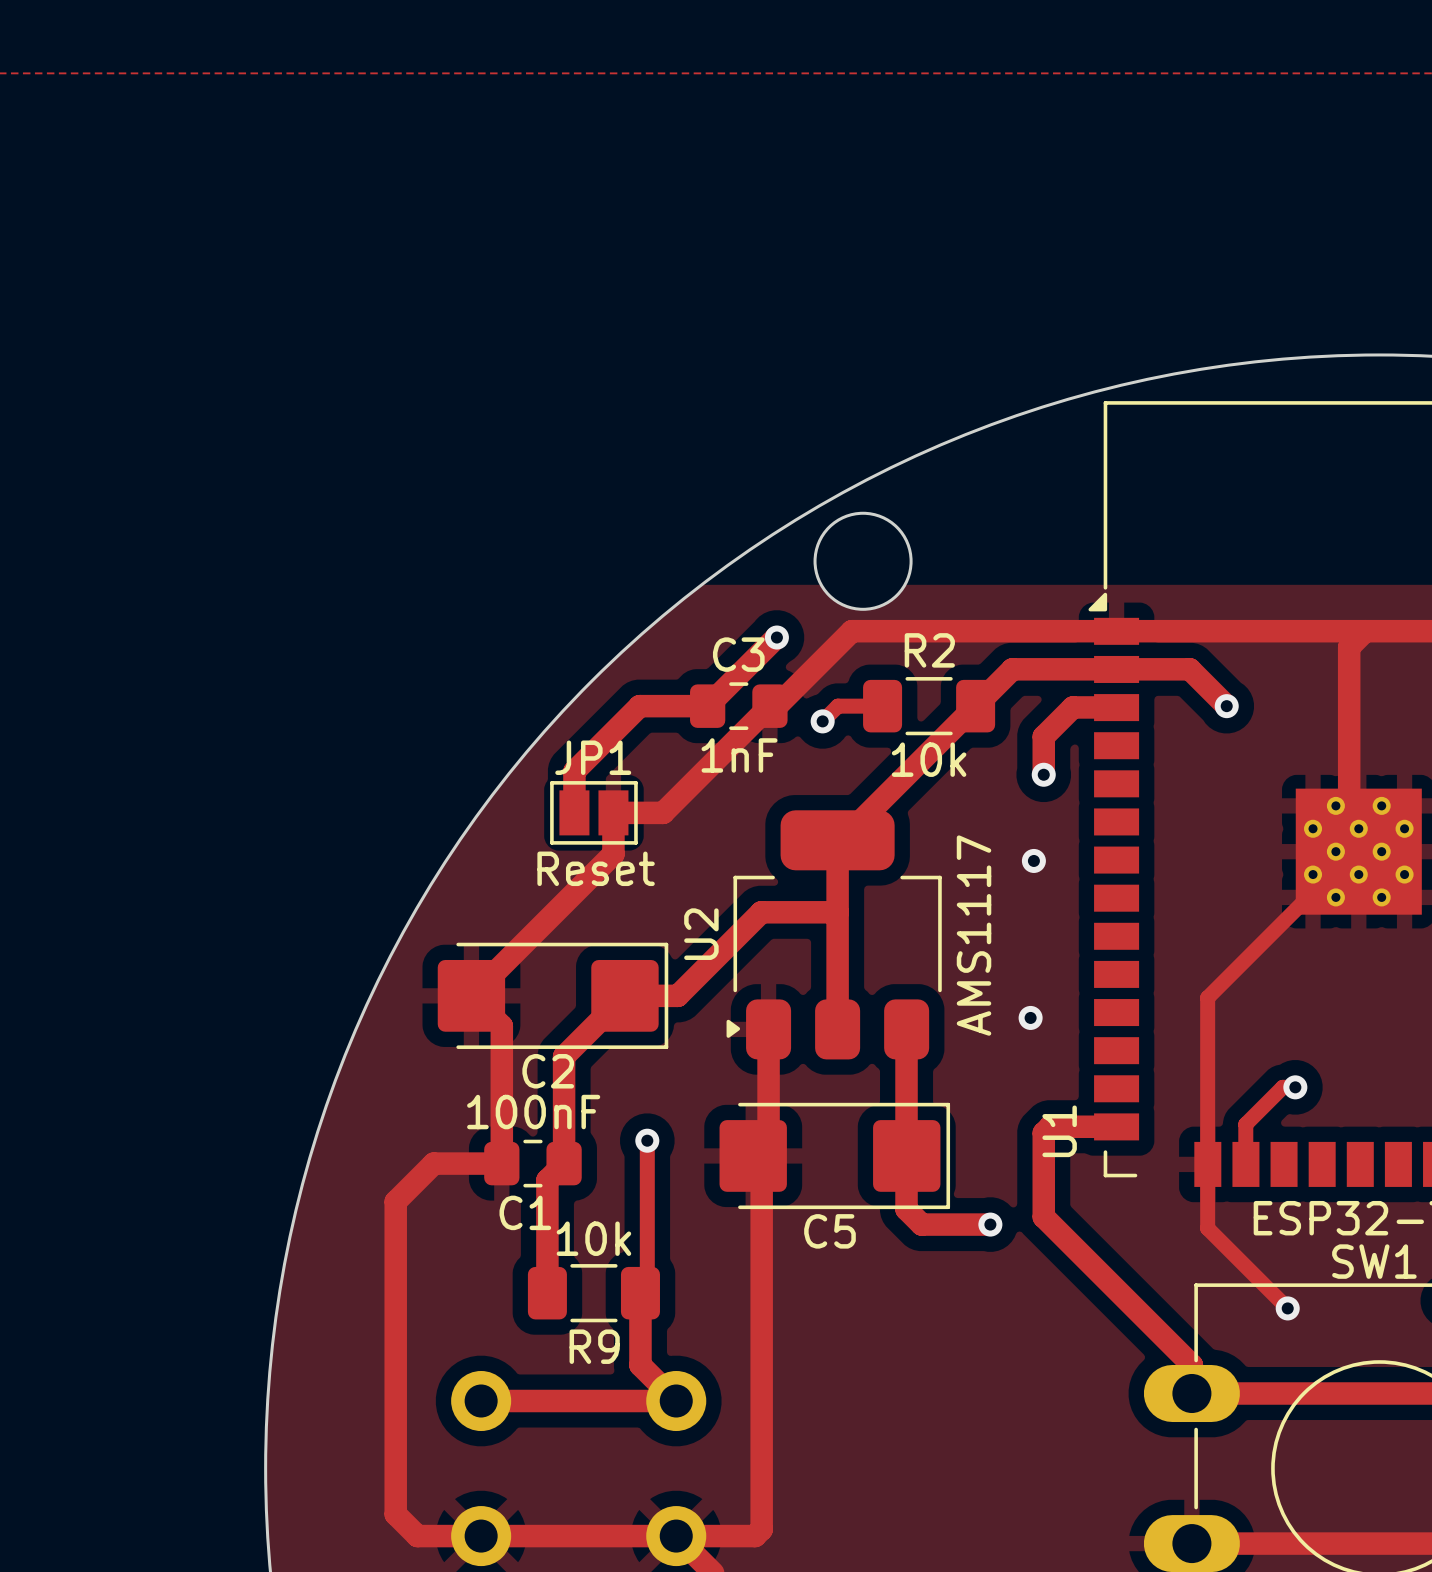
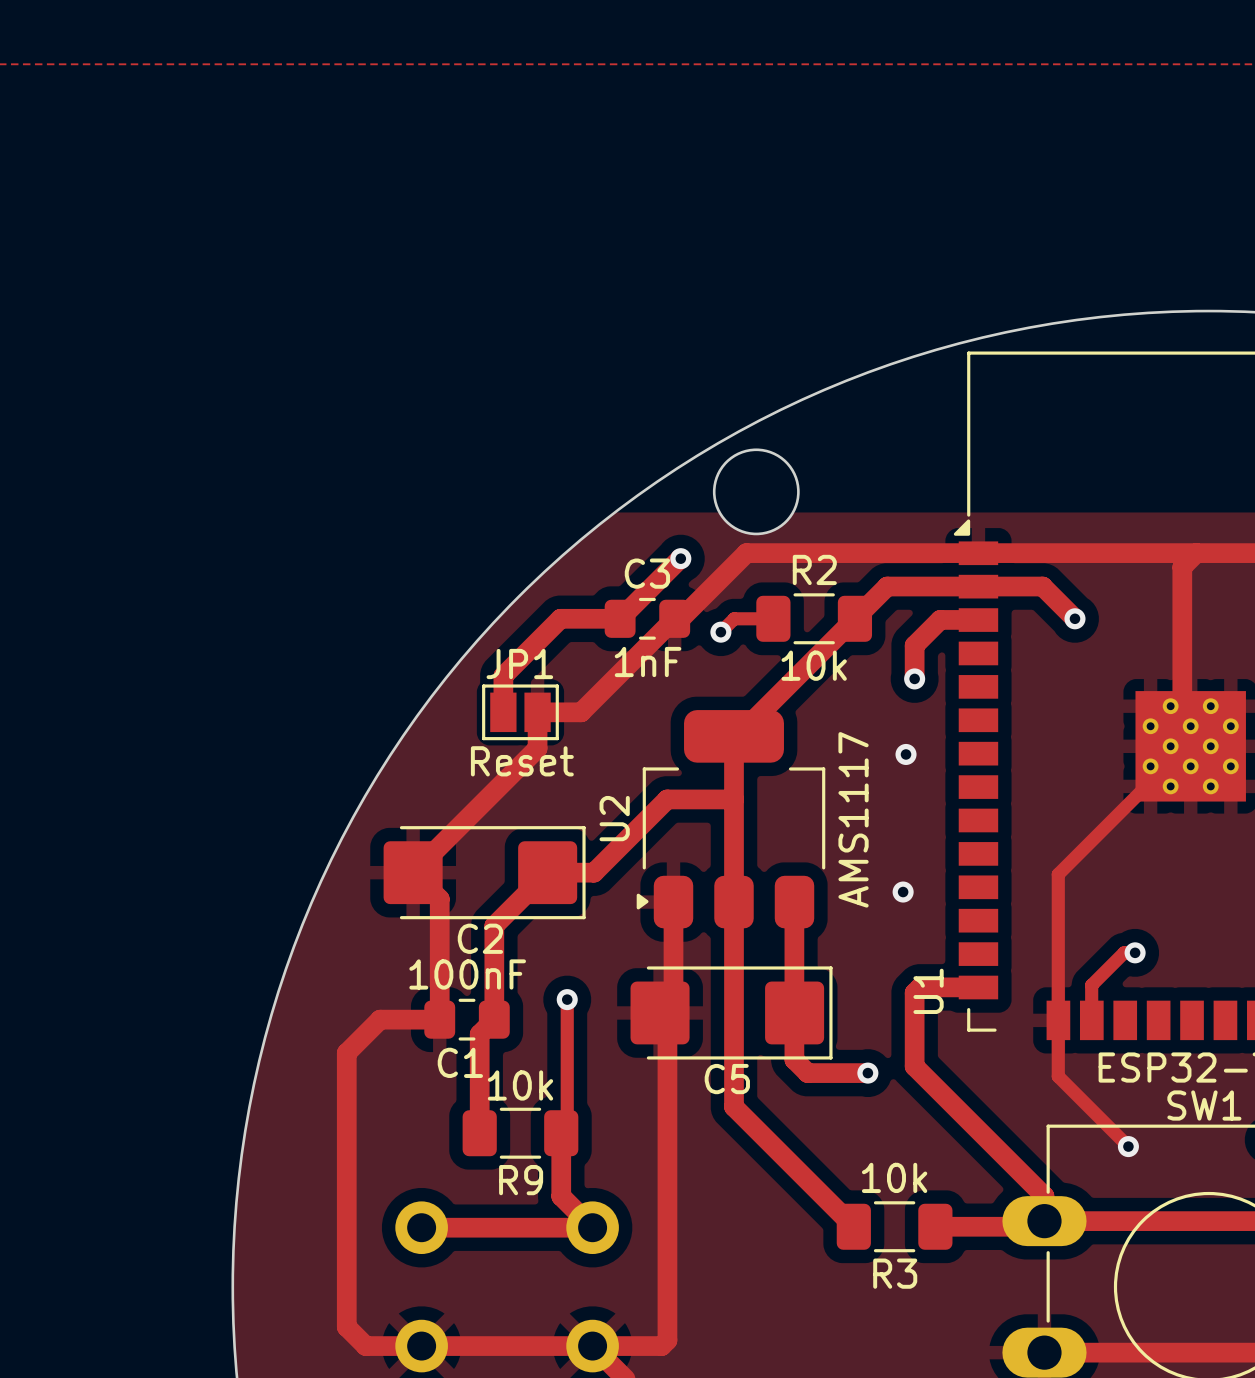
track: none -> (734, 902) (734, 1106) (853, 1226)
R3: none -> 10k (894, 1226)
track: none -> (935, 1226) (1038, 1226)

